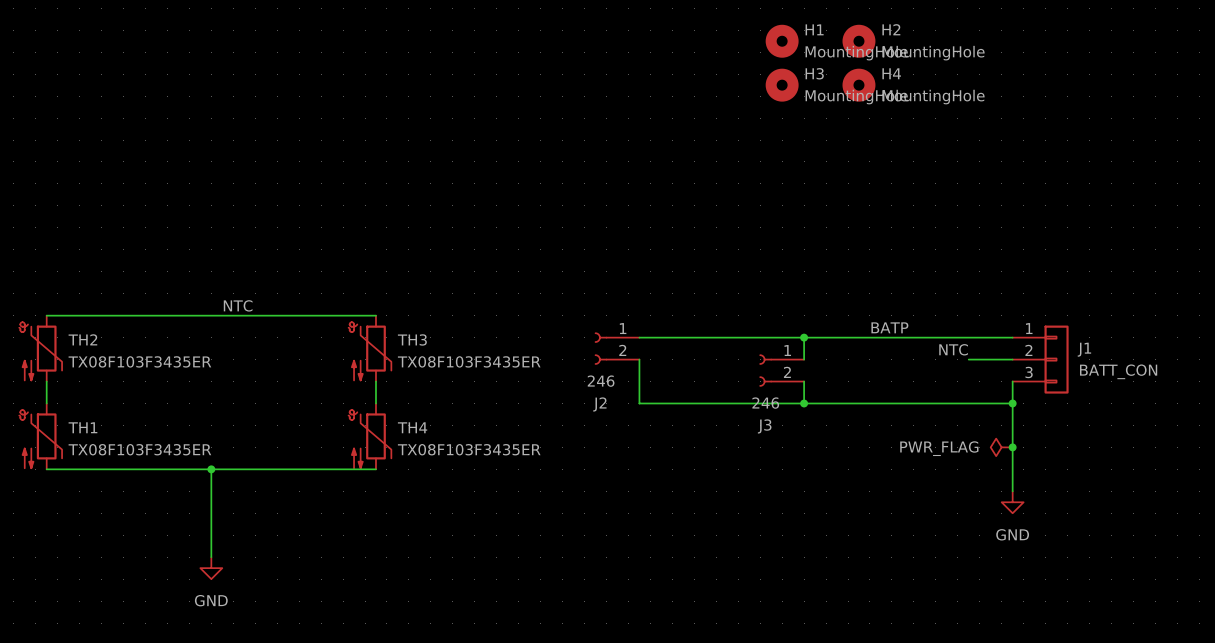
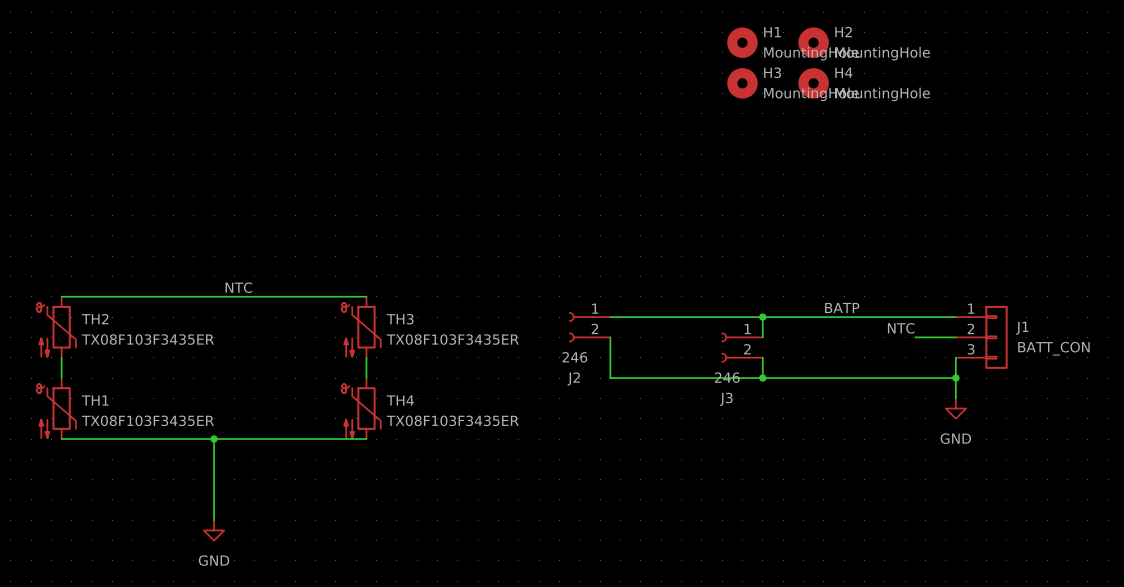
wire: (1012, 425) (1012, 491) -> none
power symbol: PWR_FLAG (1001, 447) -> none
junction: (1012, 447) -> none
power symbol position: GND (1012, 502) -> GND (955, 408)

